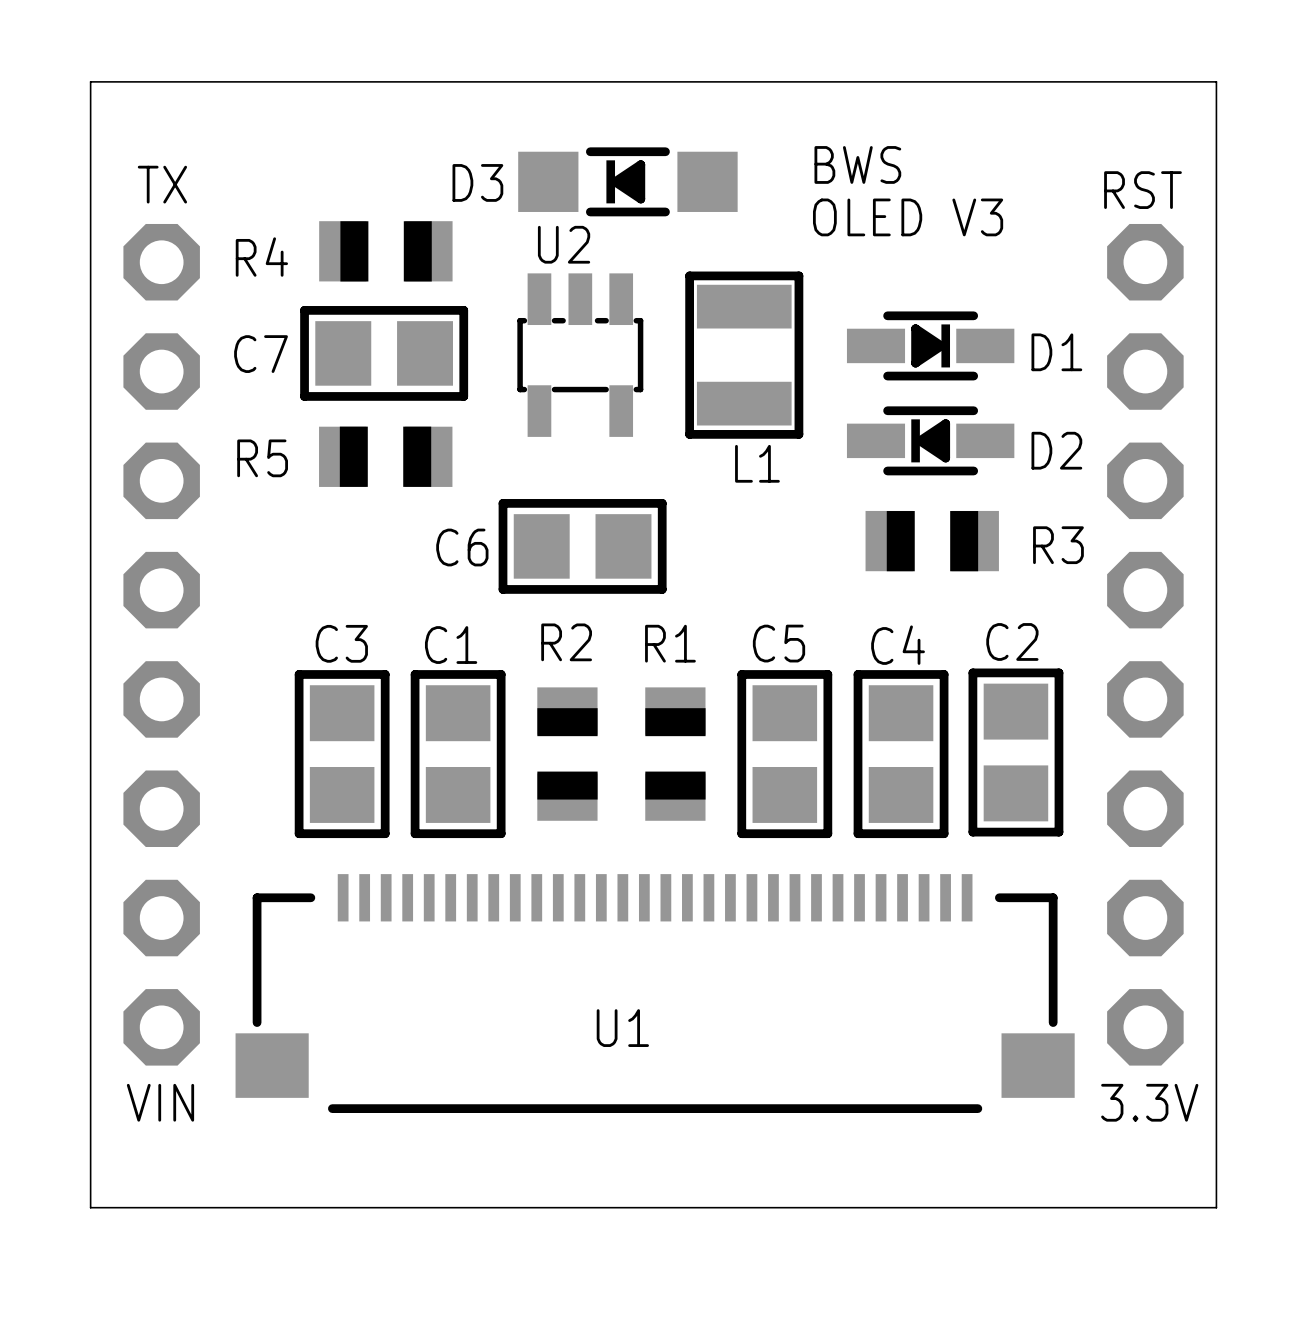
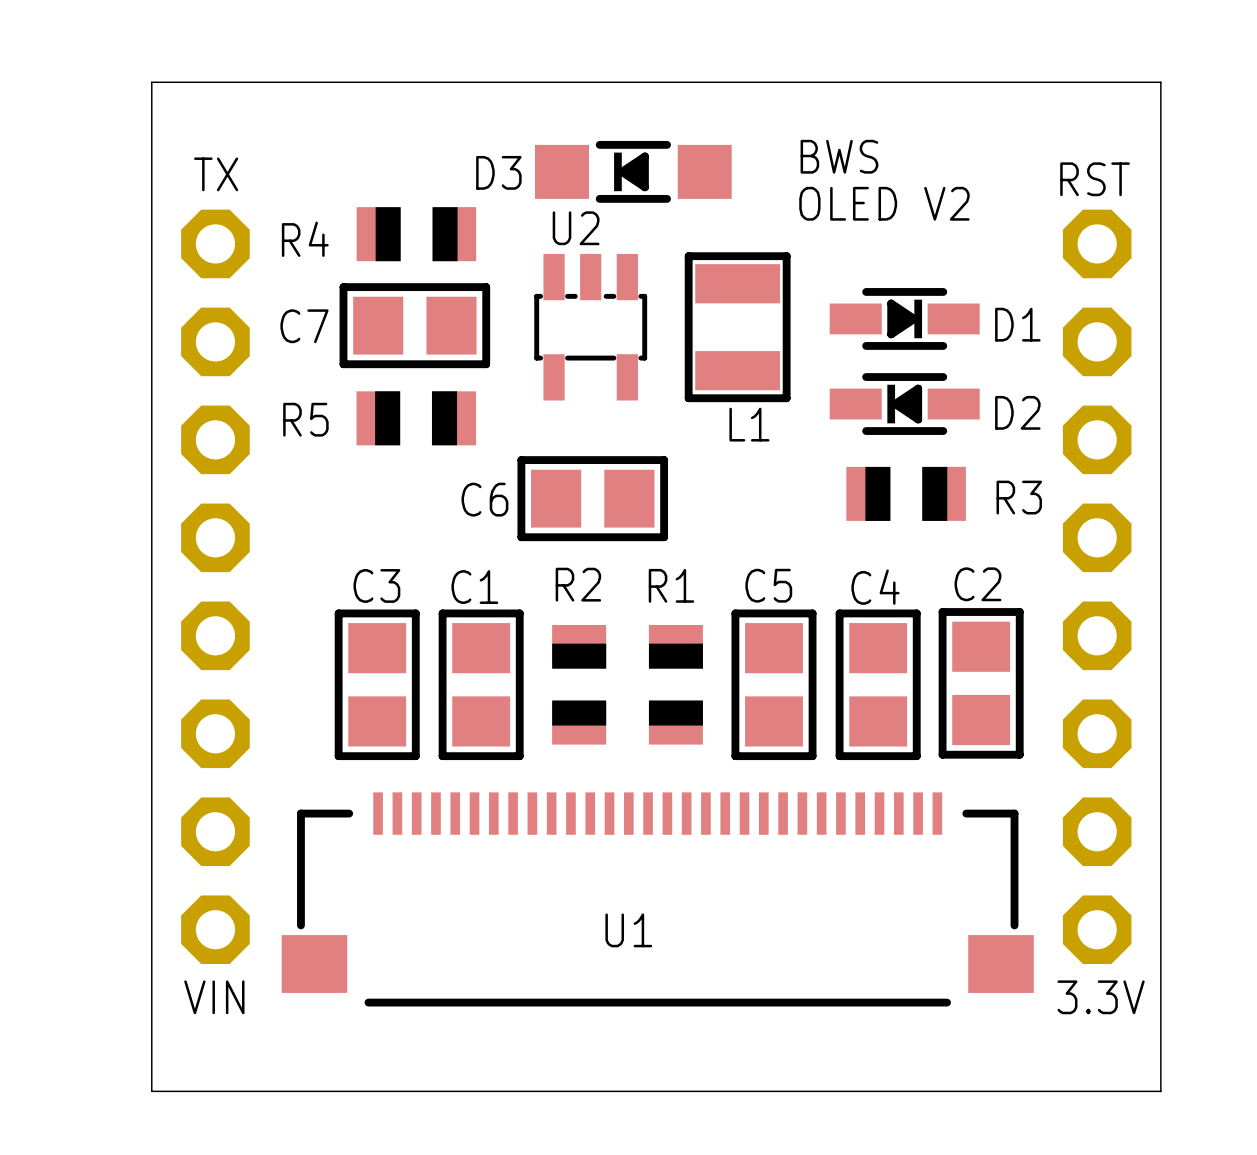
text: OLED V3 (908, 217) -> OLED V2 (884, 203)

